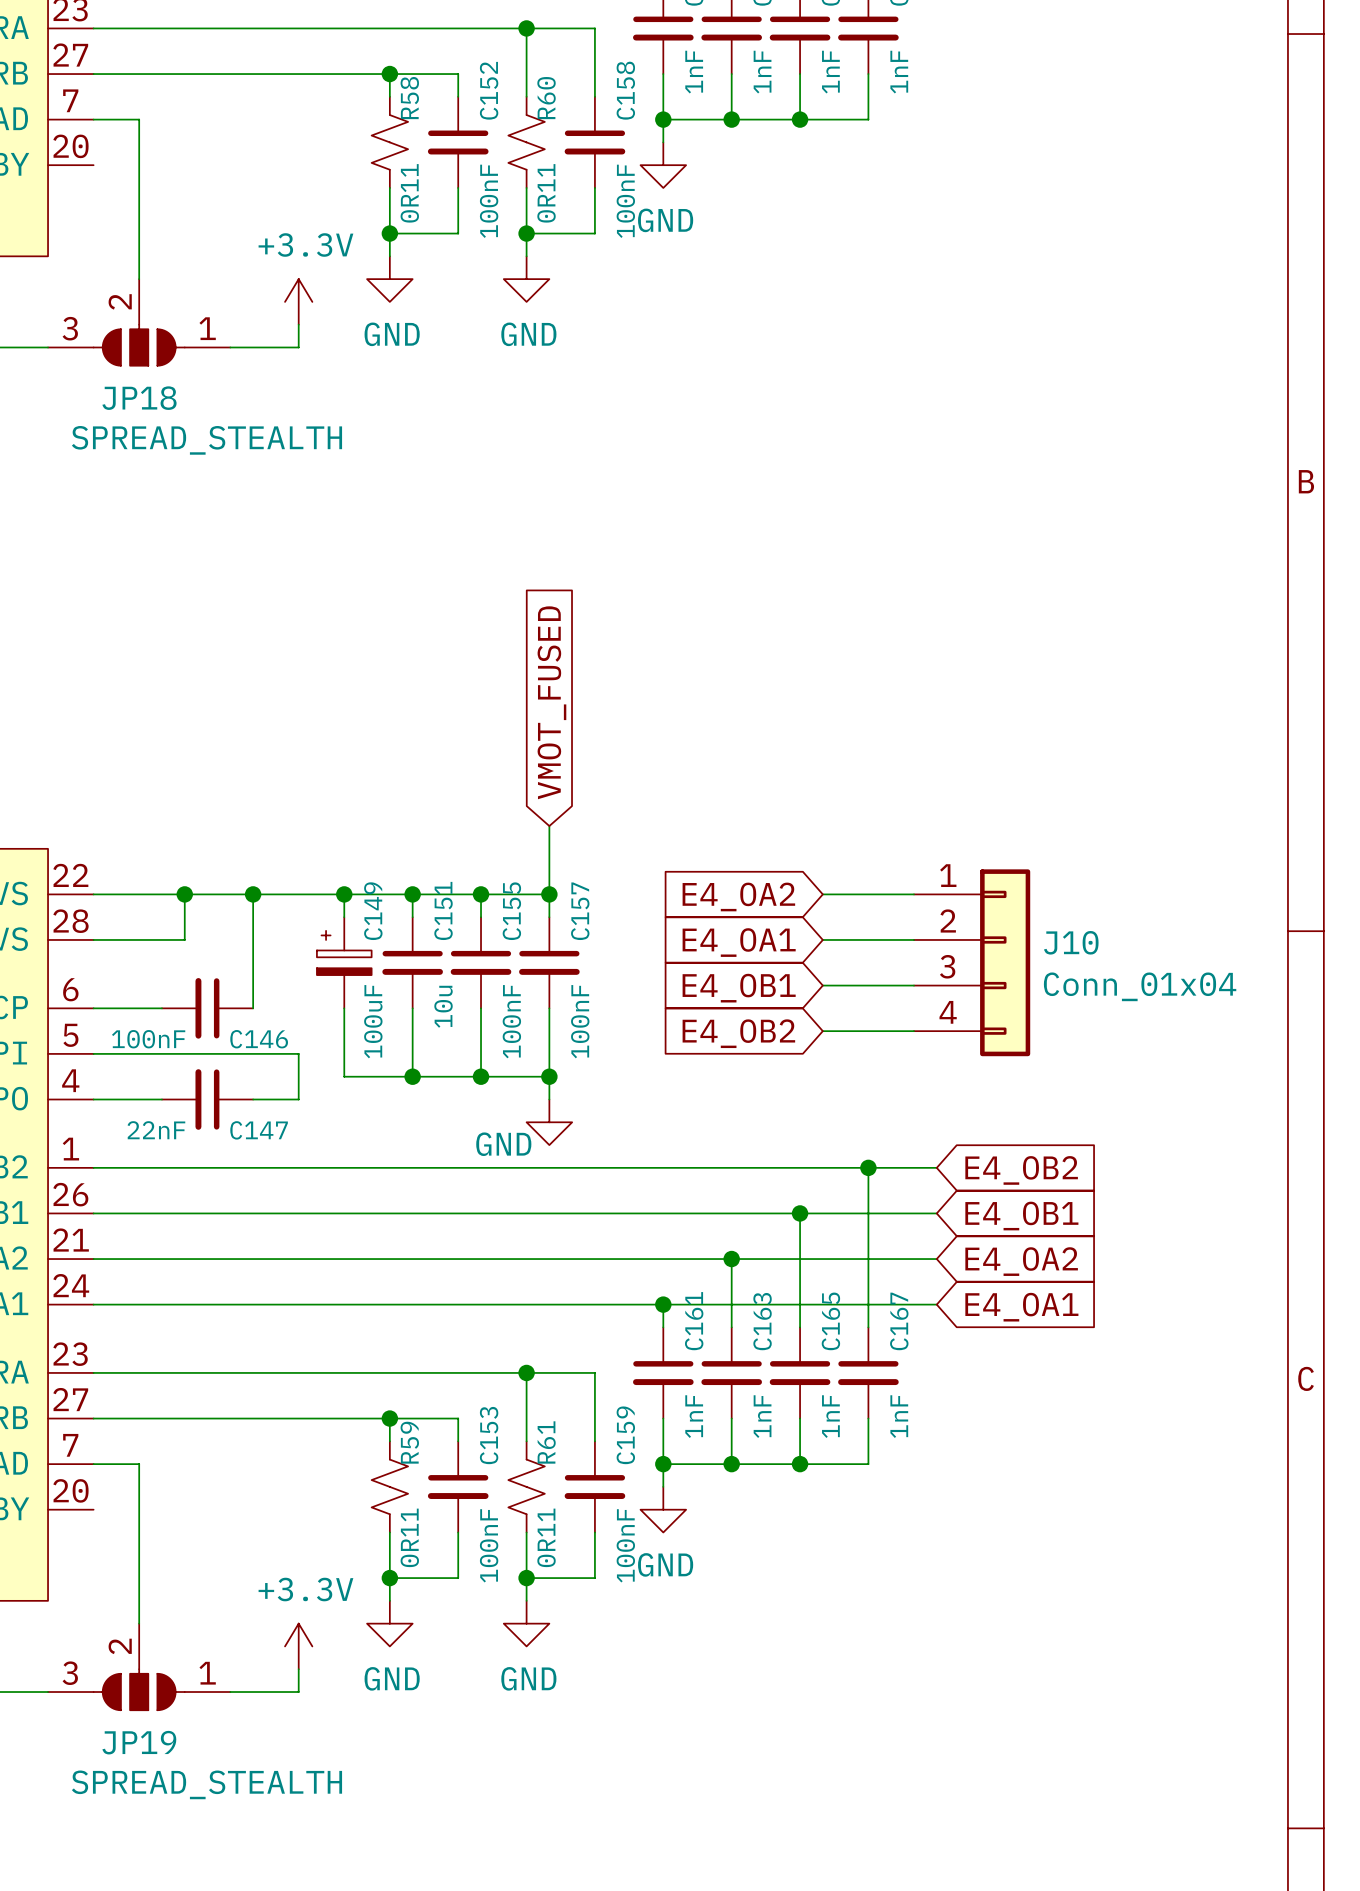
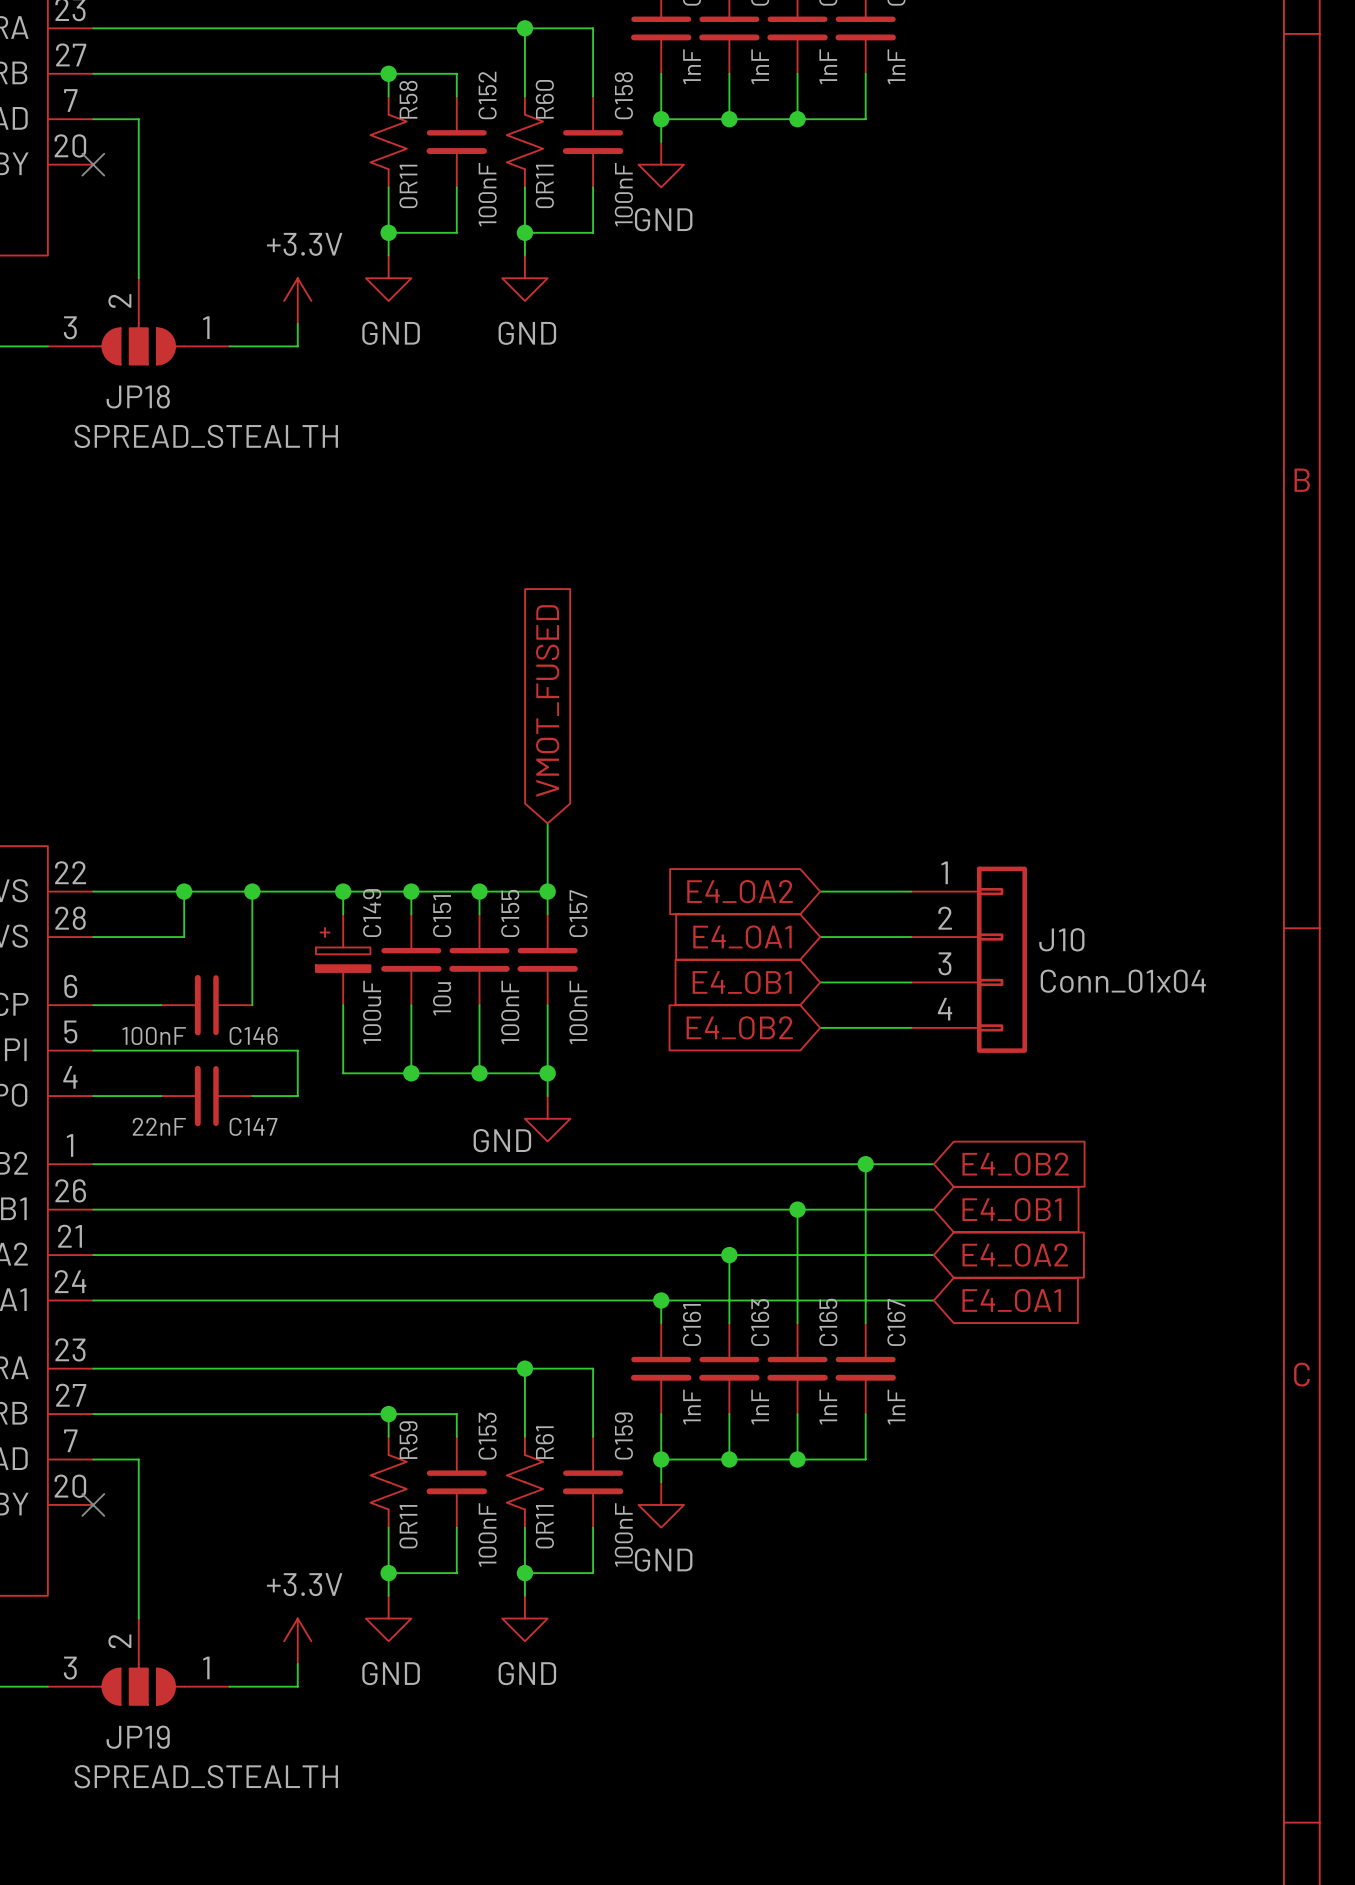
no-connect mark: none -> (93, 164)
no-connect mark: none -> (93, 1504)

